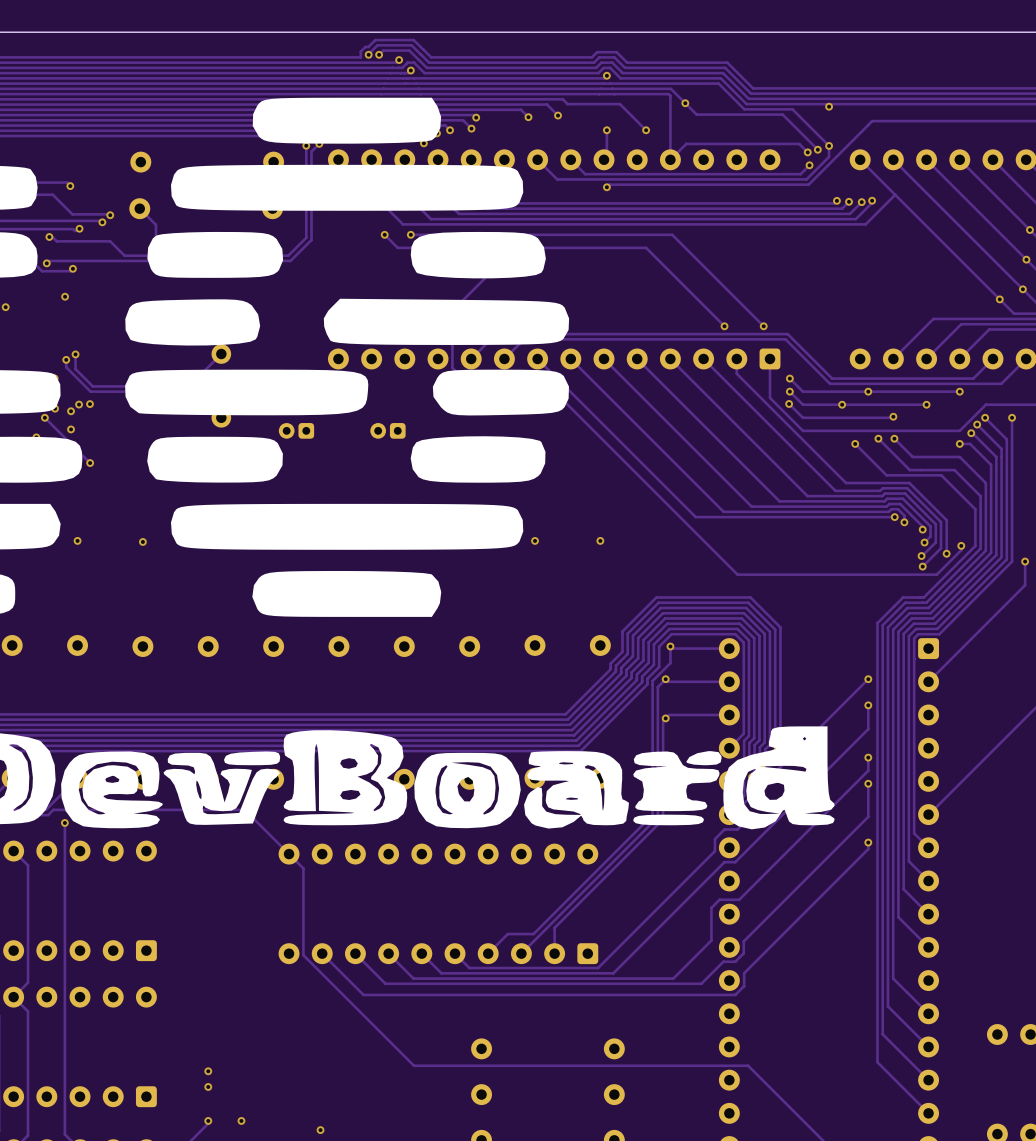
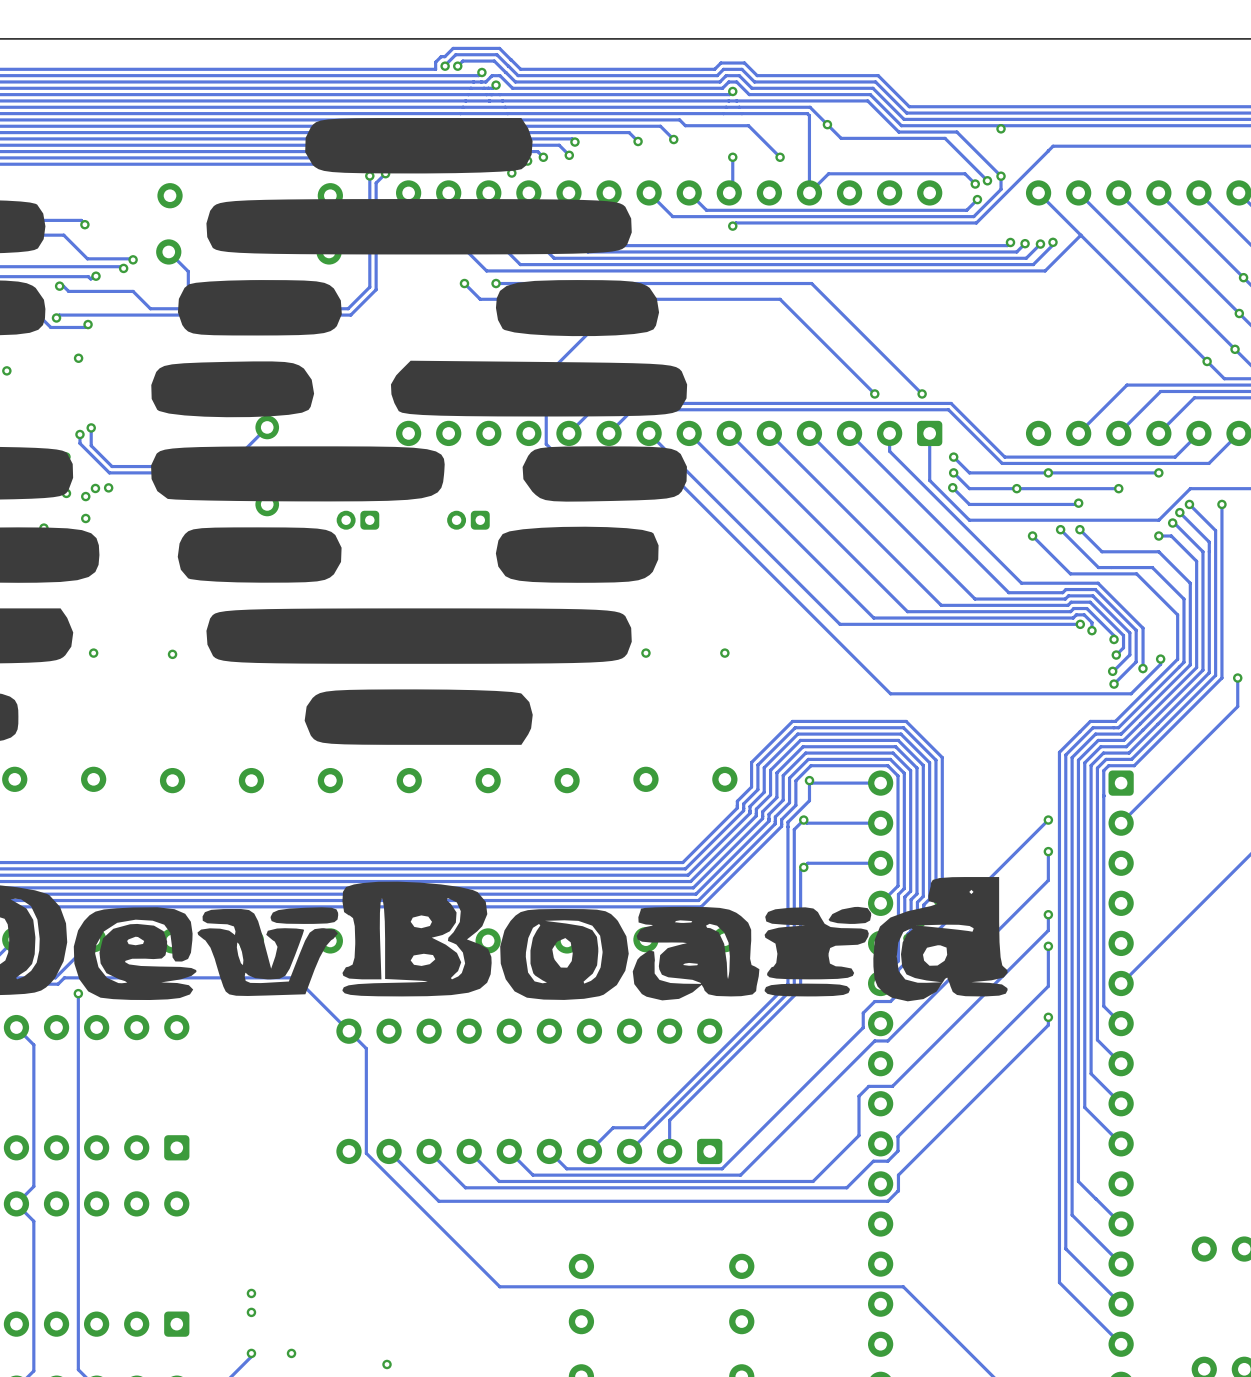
track: (44, 417) (90, 463) -> none
via: (44, 417) -> none
via: (90, 463) -> none

